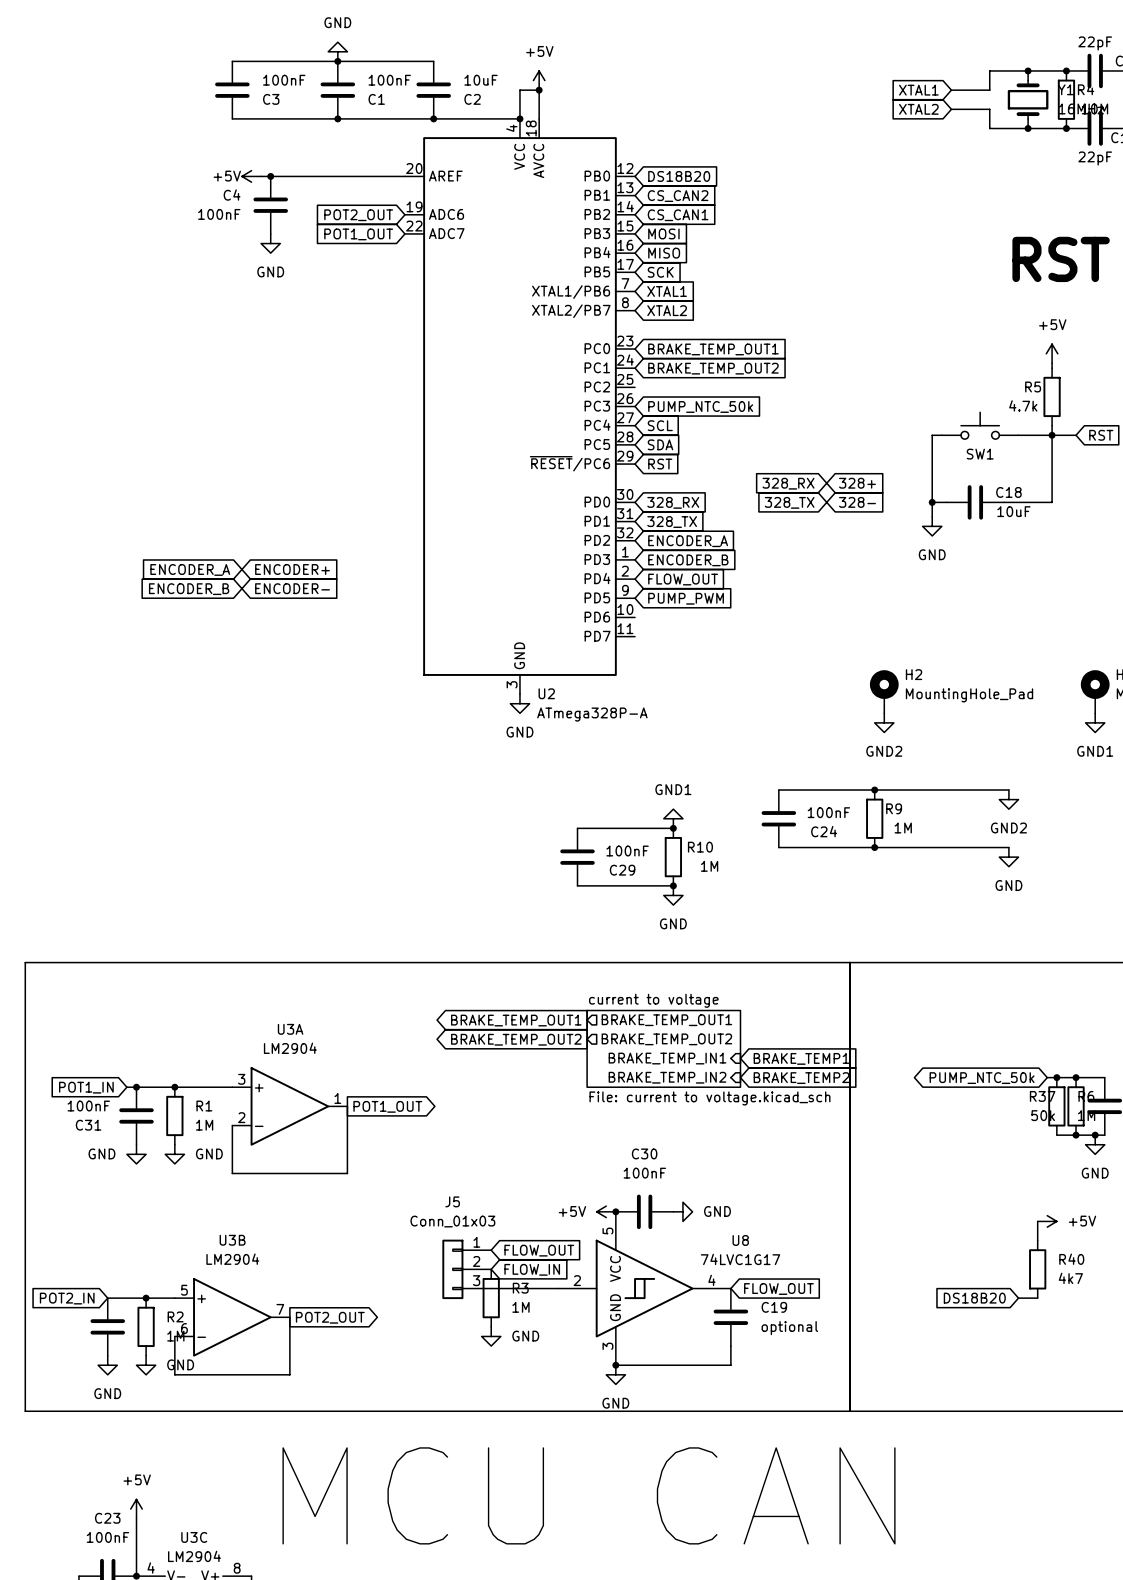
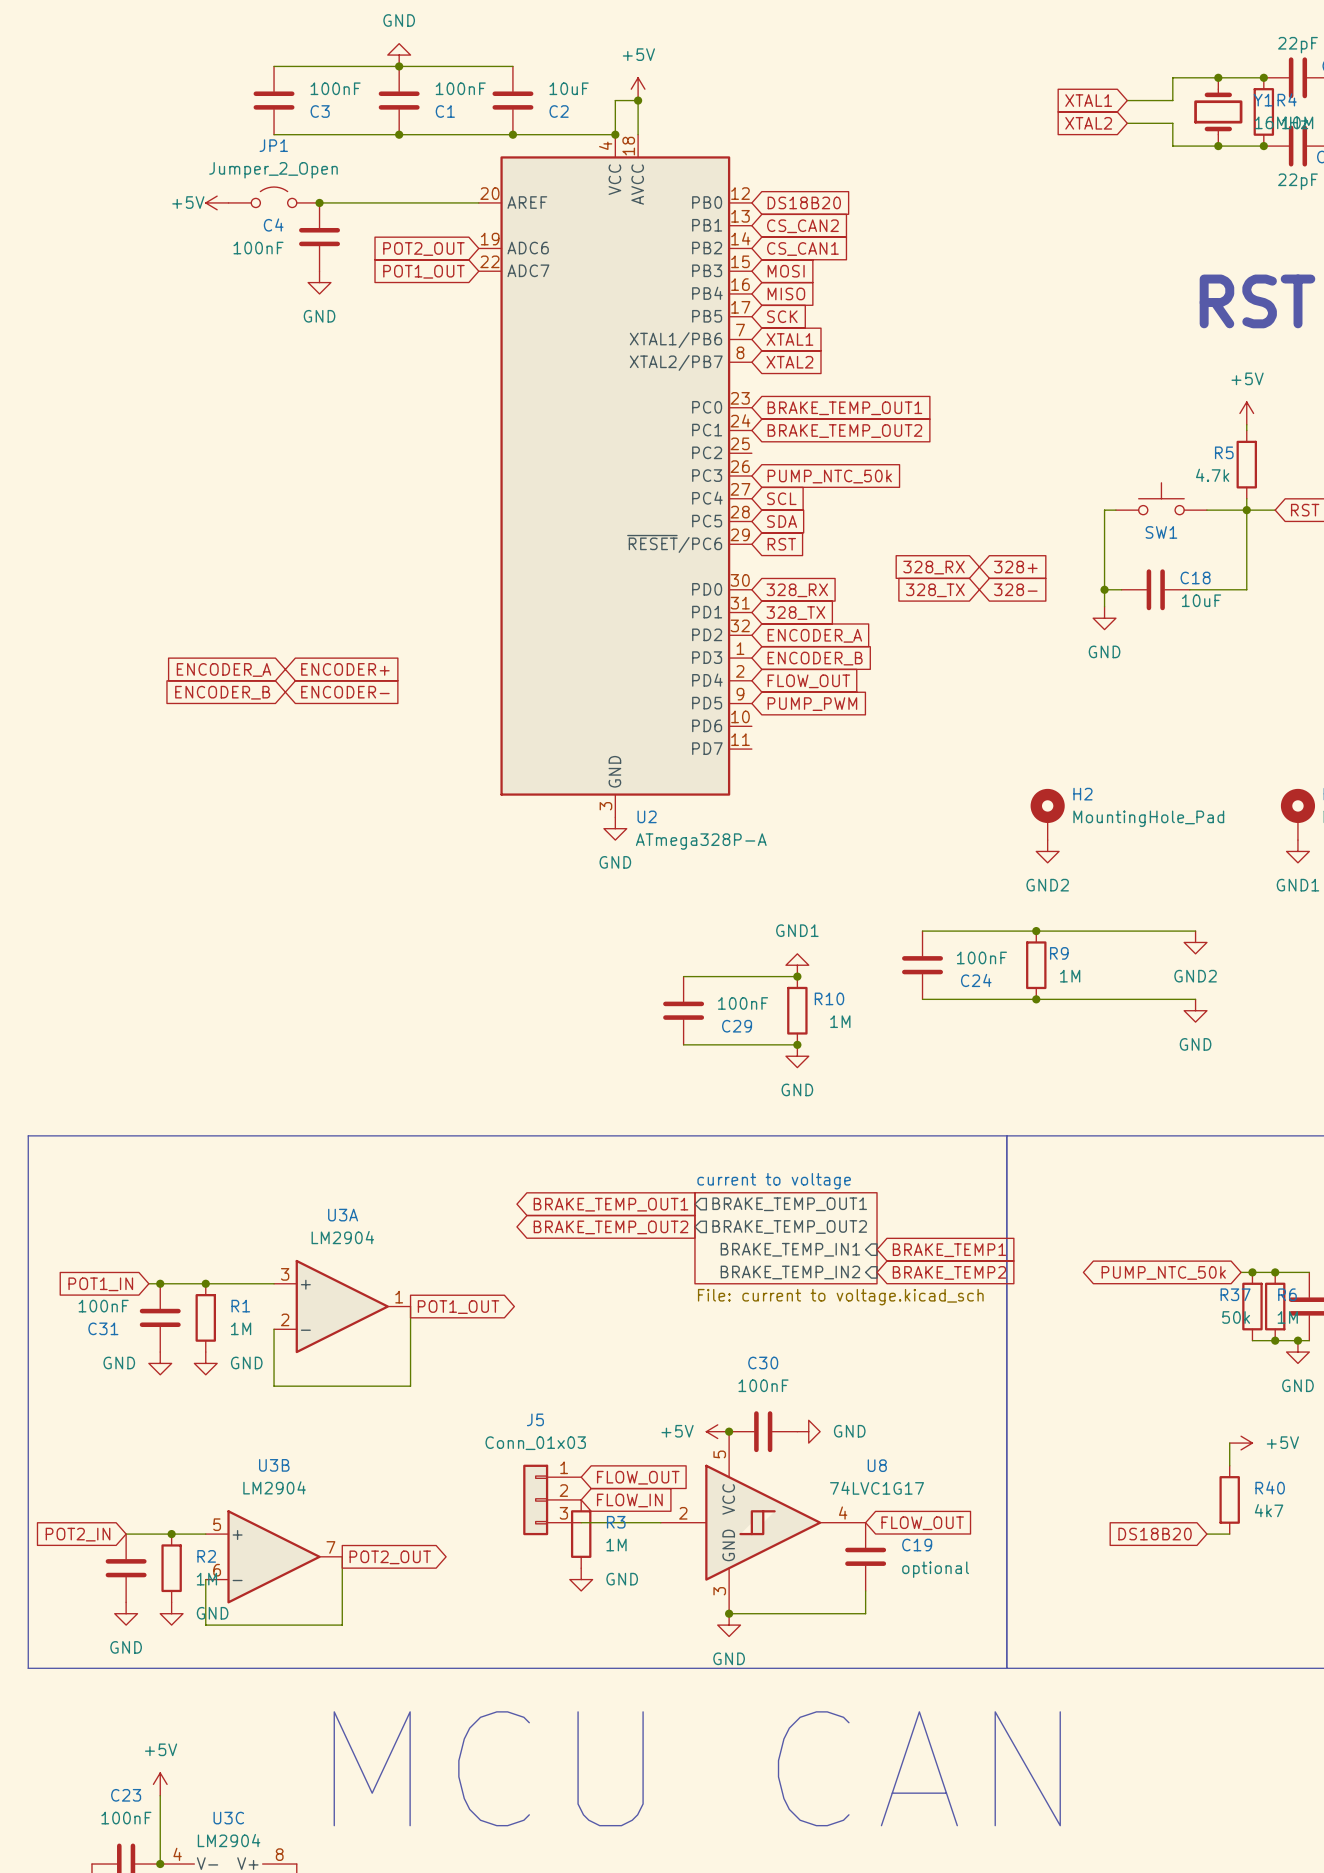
JP1: none -> Jumper_2_Open (274, 197)
power symbol position: +5V (251, 176) -> +5V (217, 202)

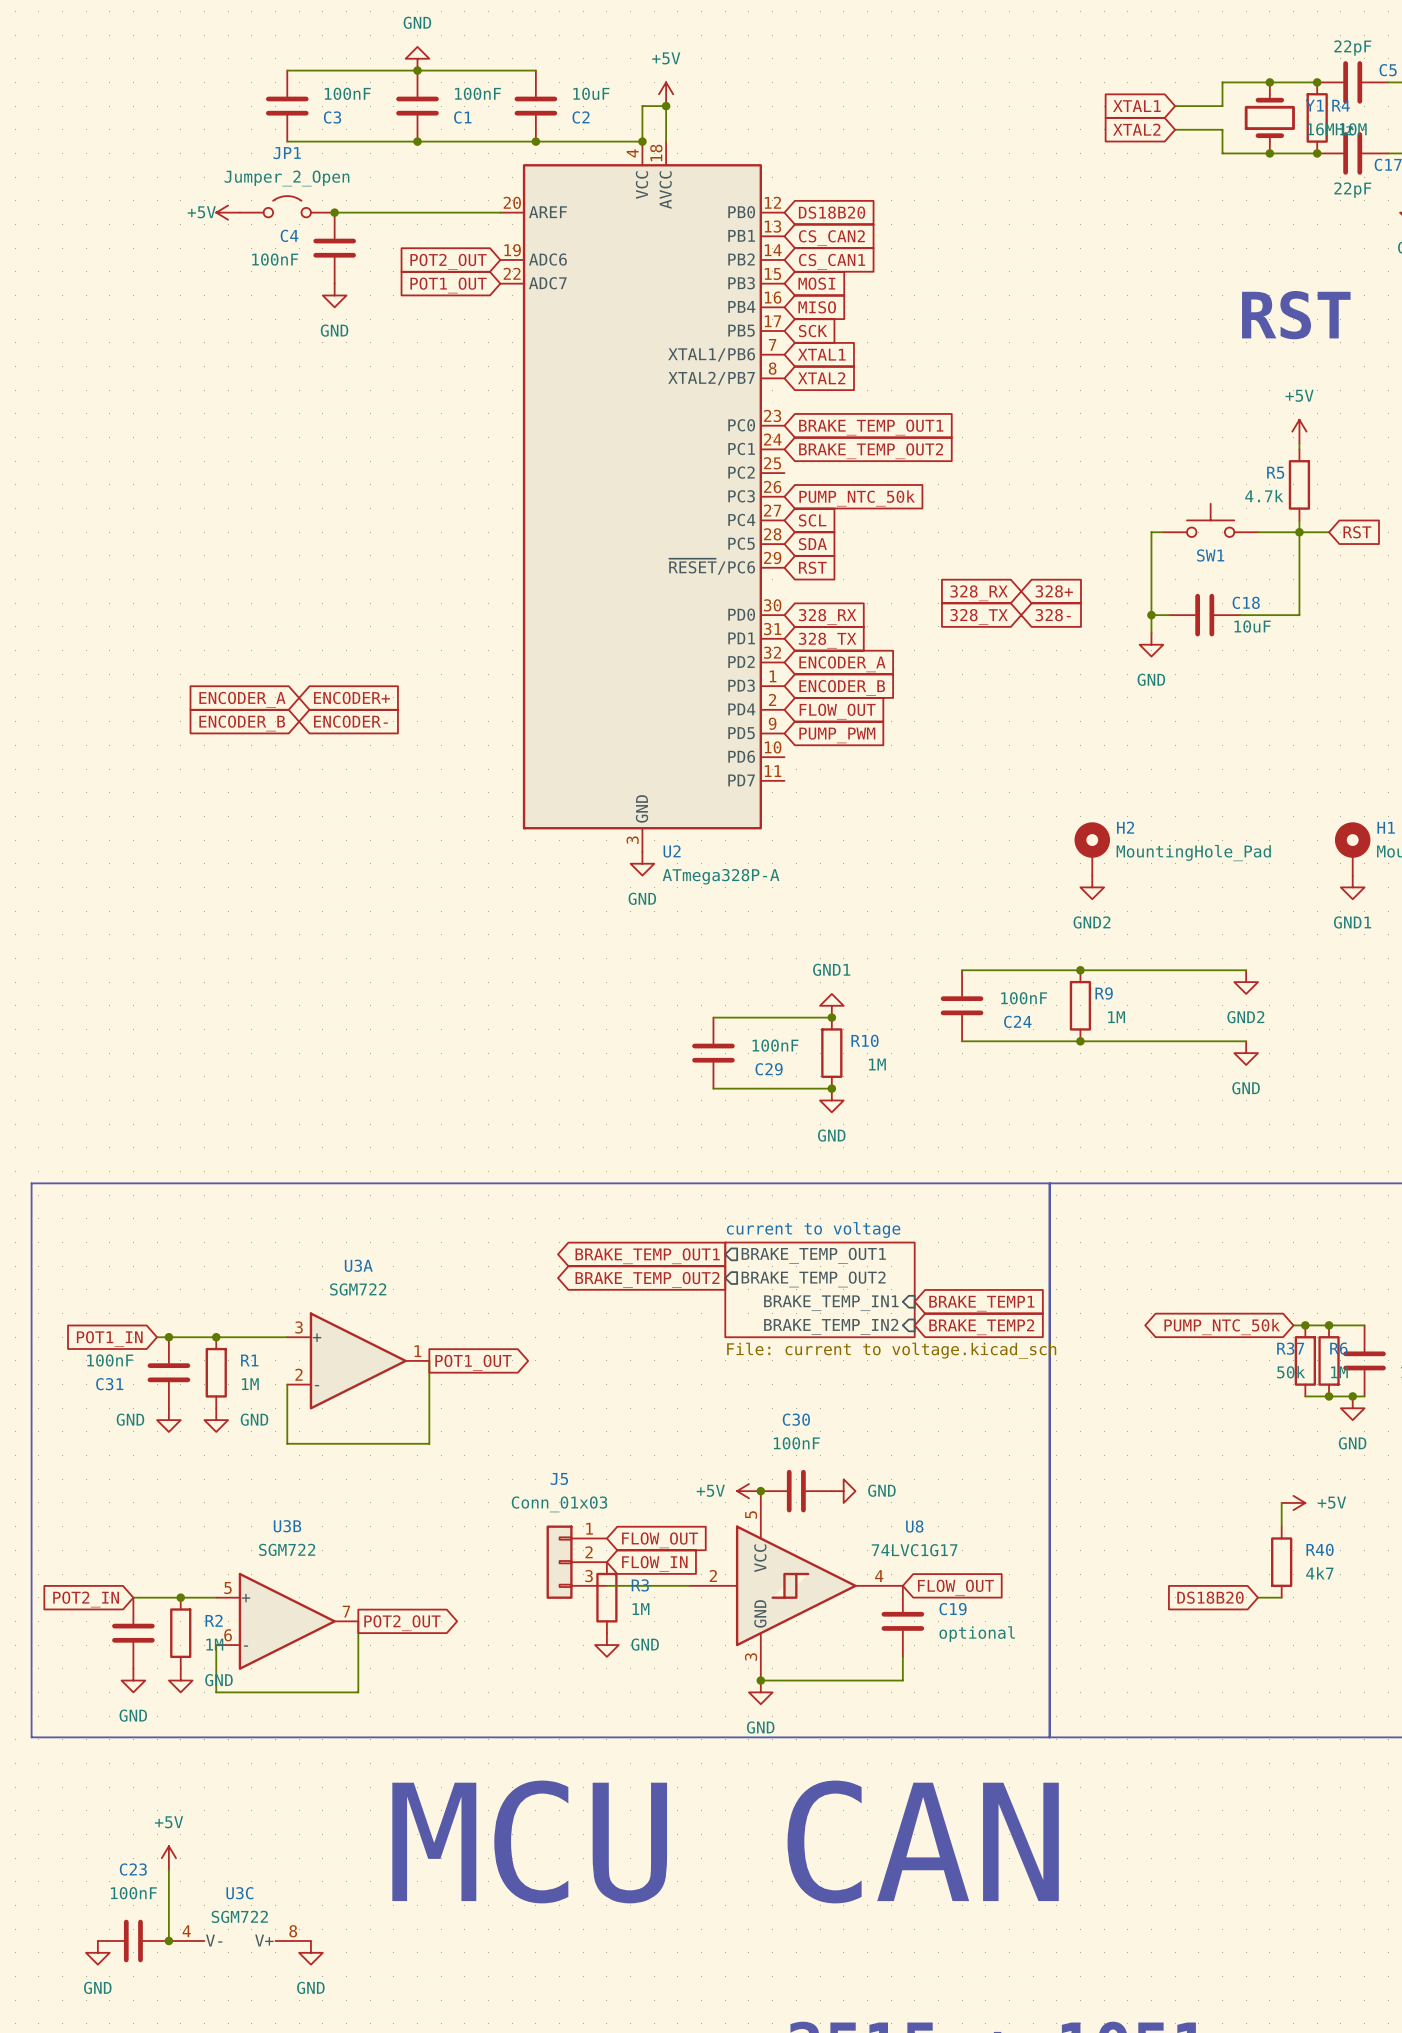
U3A value: LM2904 (342, 1237) -> SGM722 (358, 1289)
U3B value: LM2904 (274, 1487) -> SGM722 (287, 1549)
U3C value: LM2904 (229, 1840) -> SGM722 (239, 1916)

